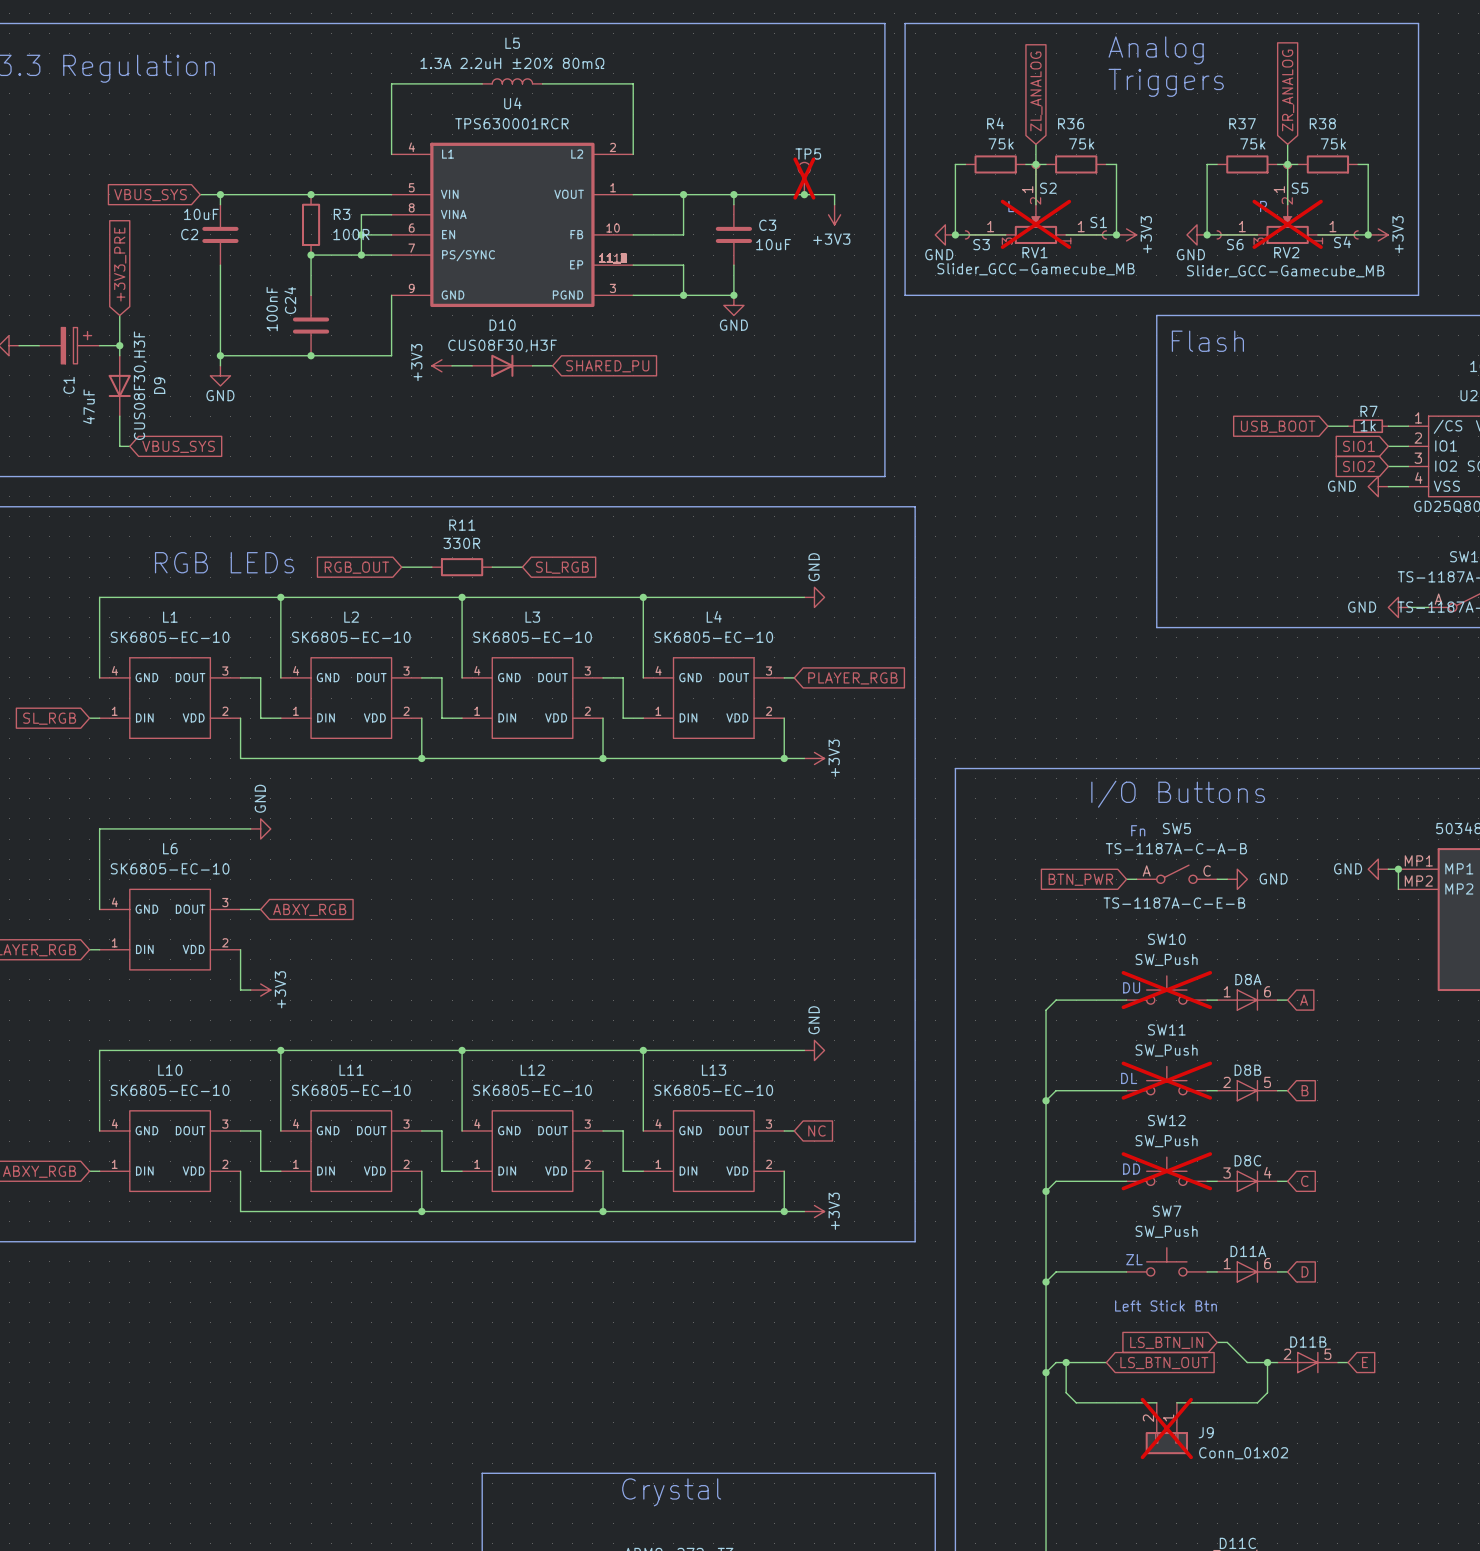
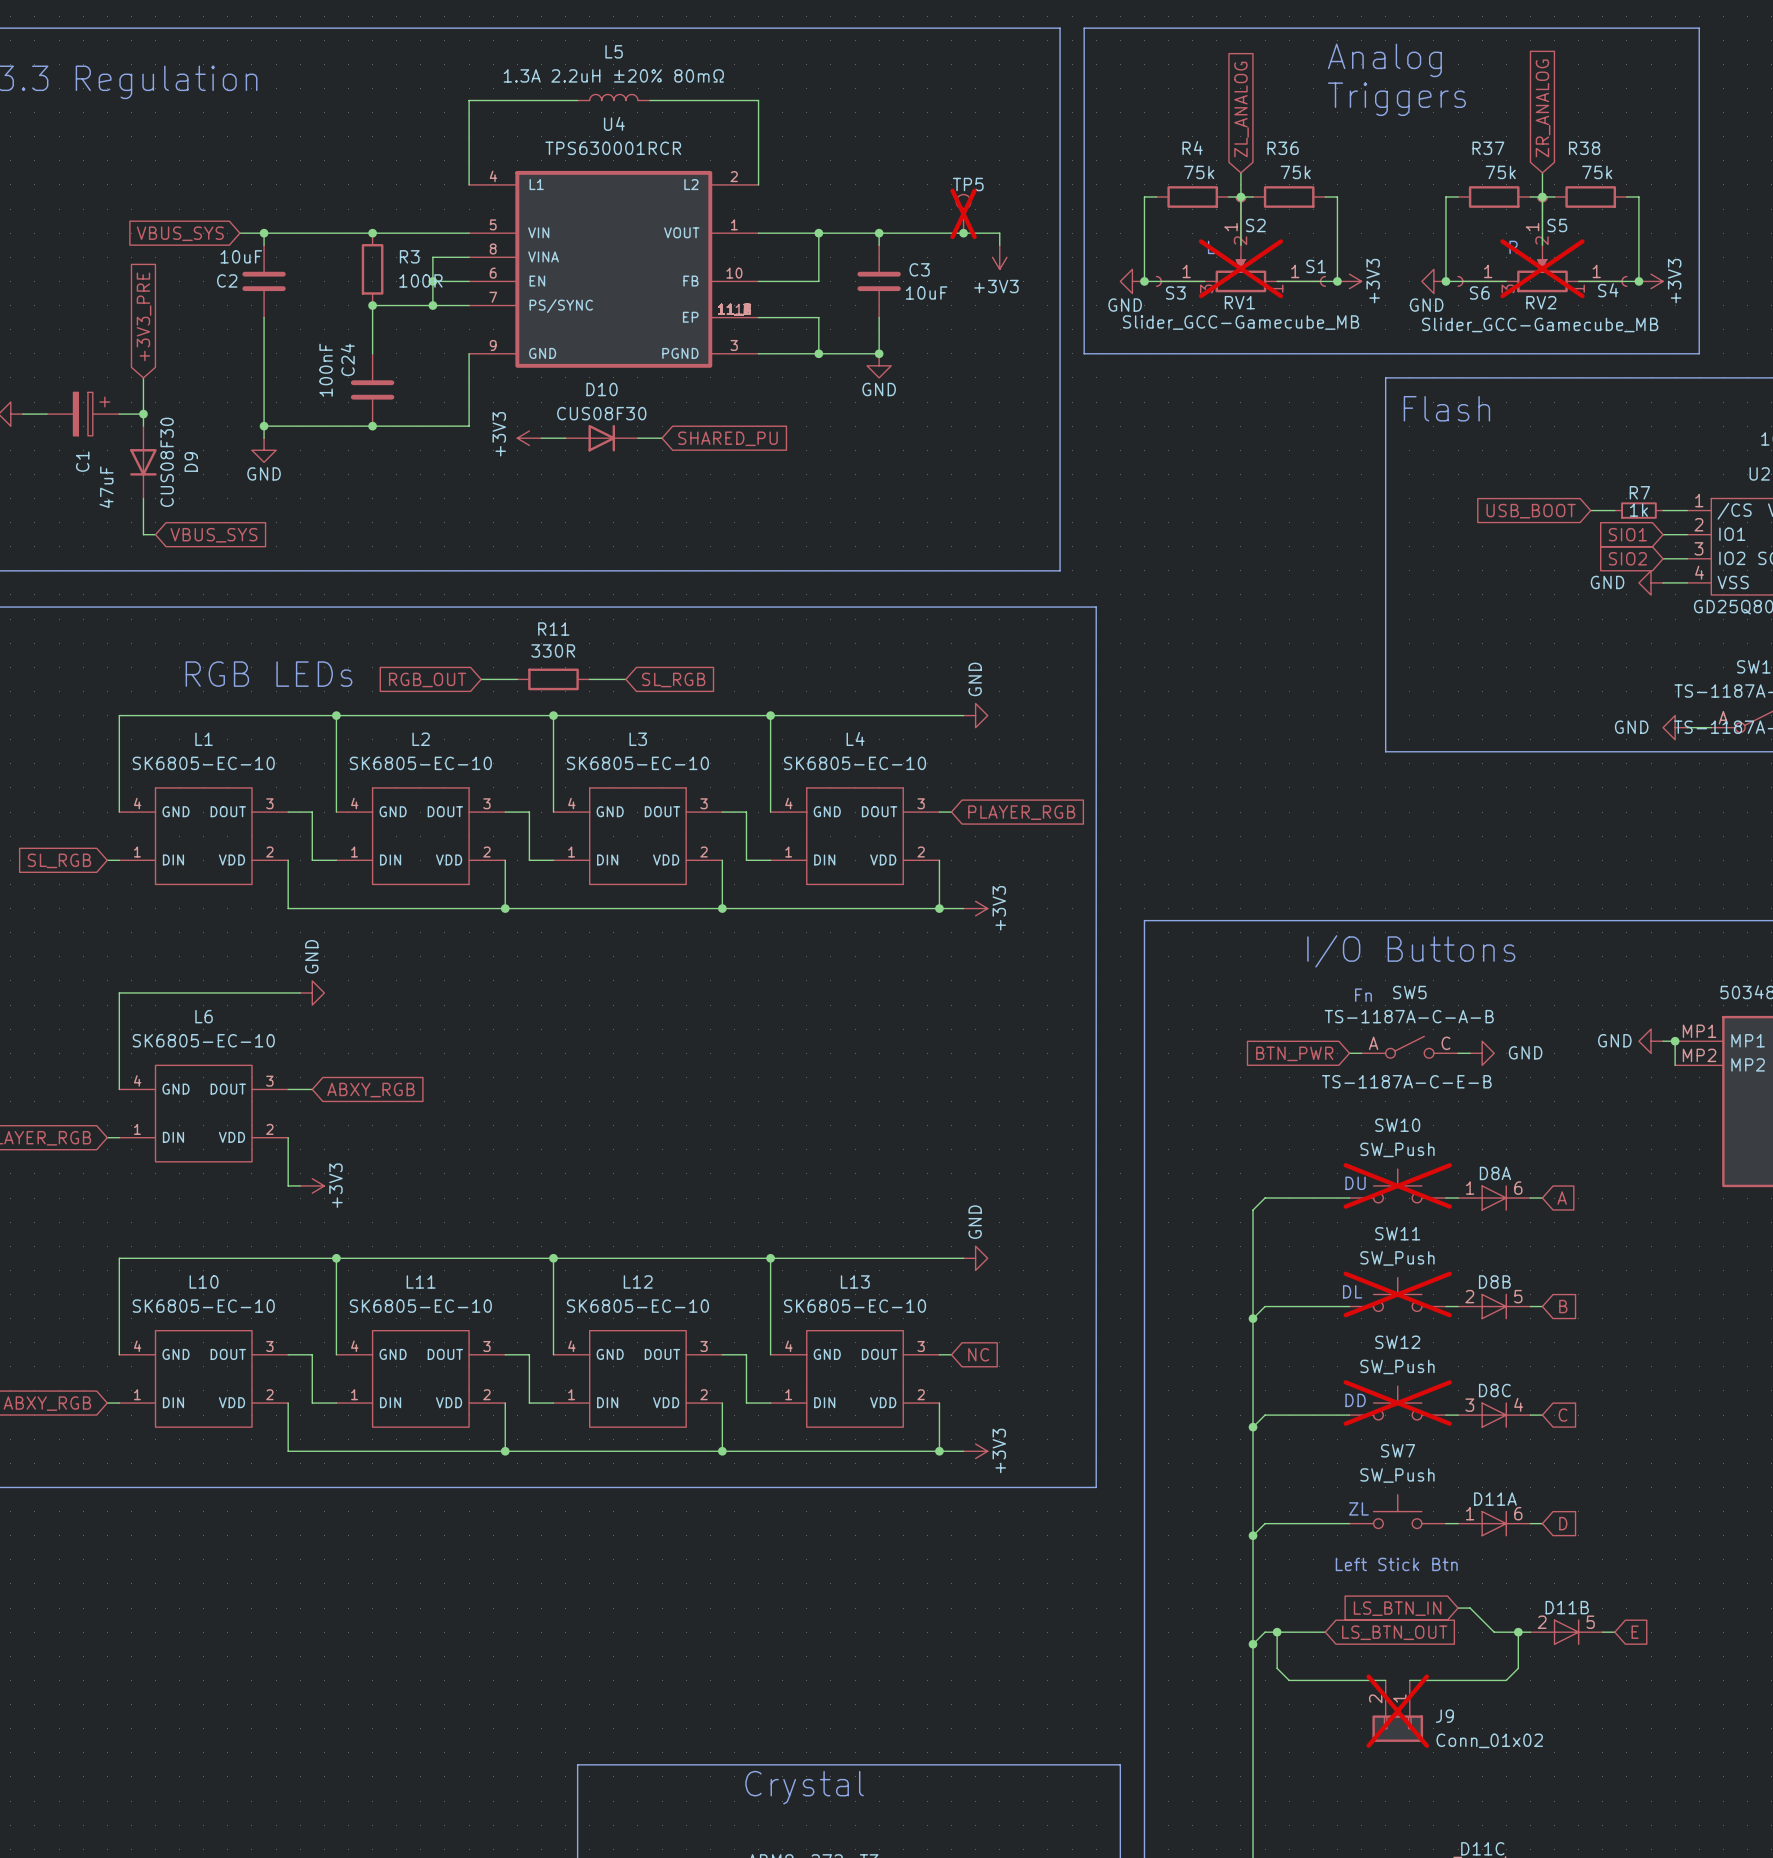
D10 value: CUS08F30,H3F (502, 346) -> CUS08F30 (601, 413)
D9 value: CUS08F30,H3F (140, 385) -> CUS08F30 (167, 462)

